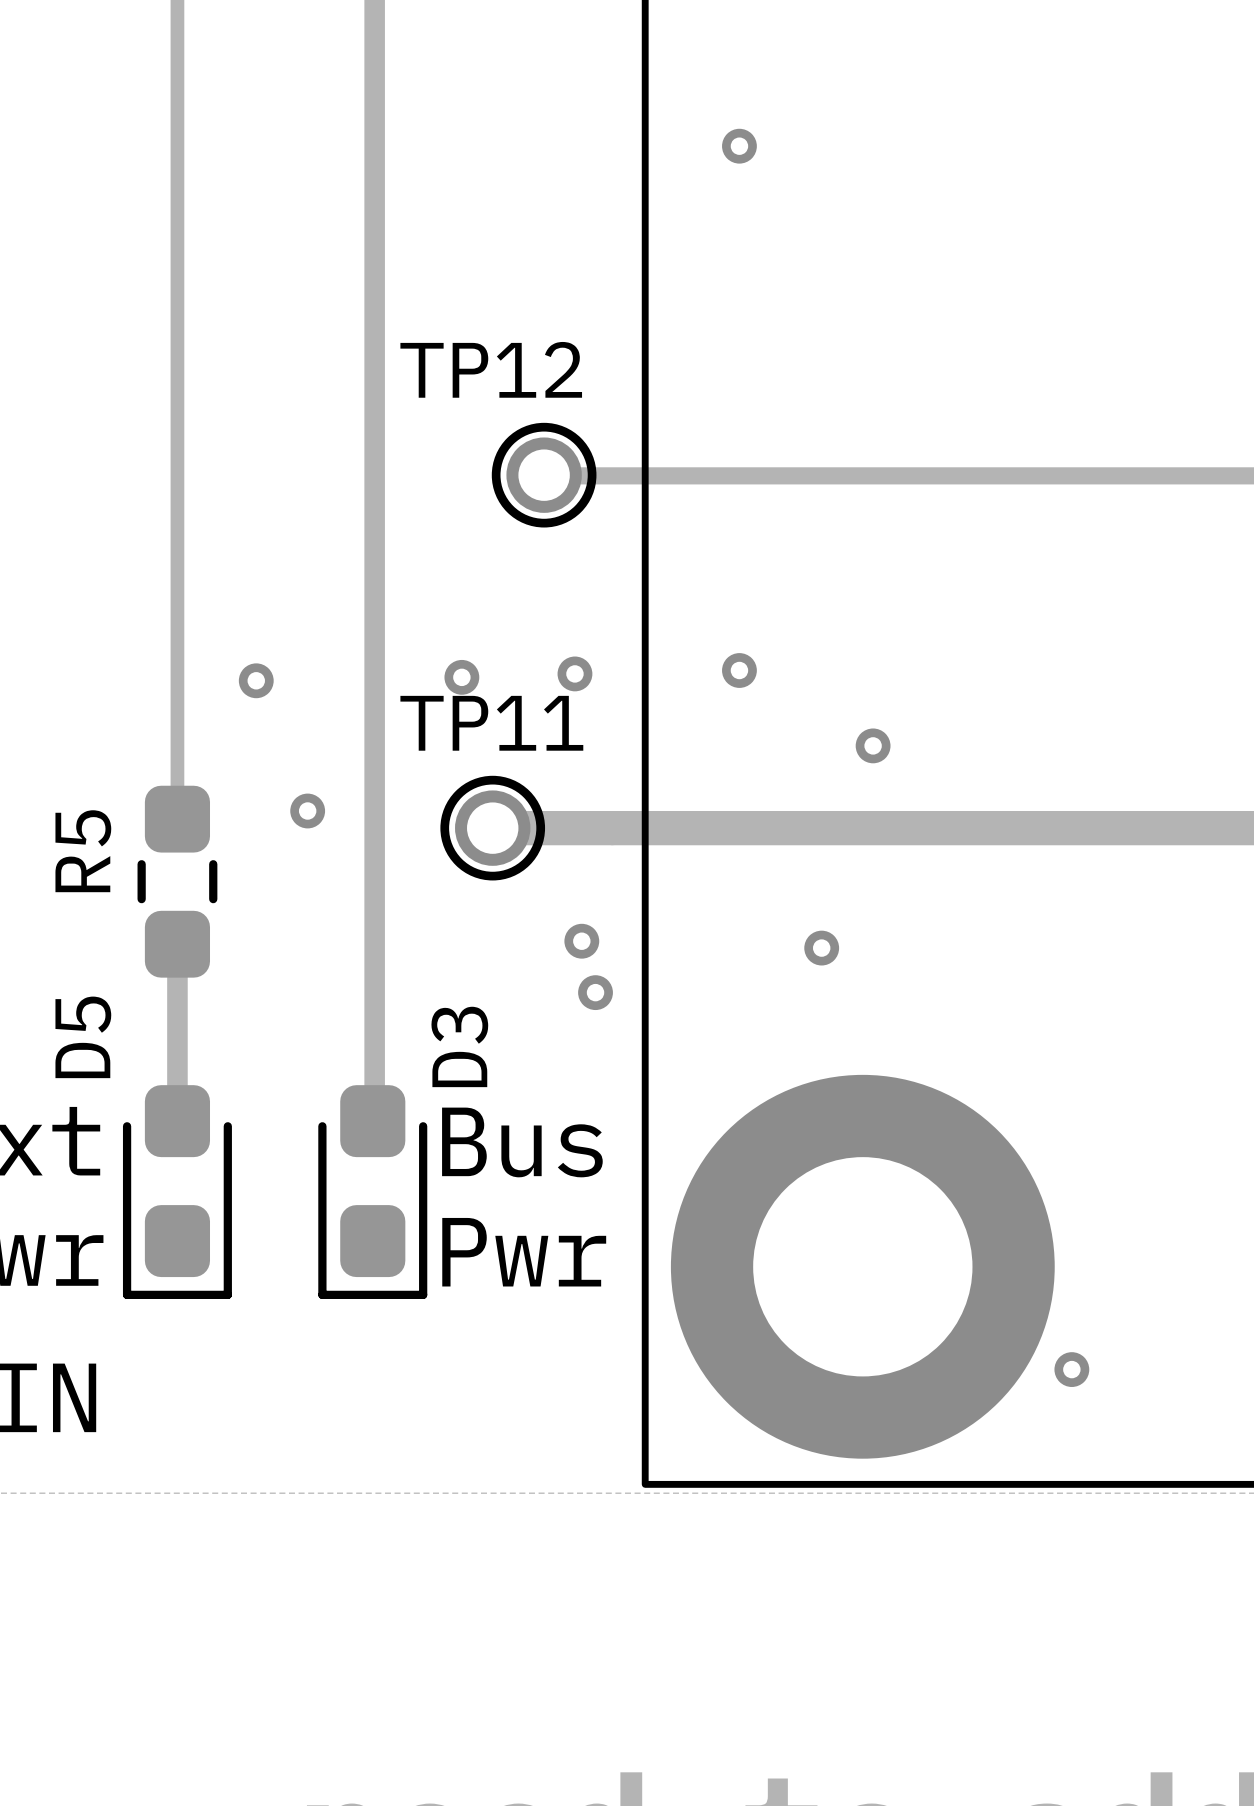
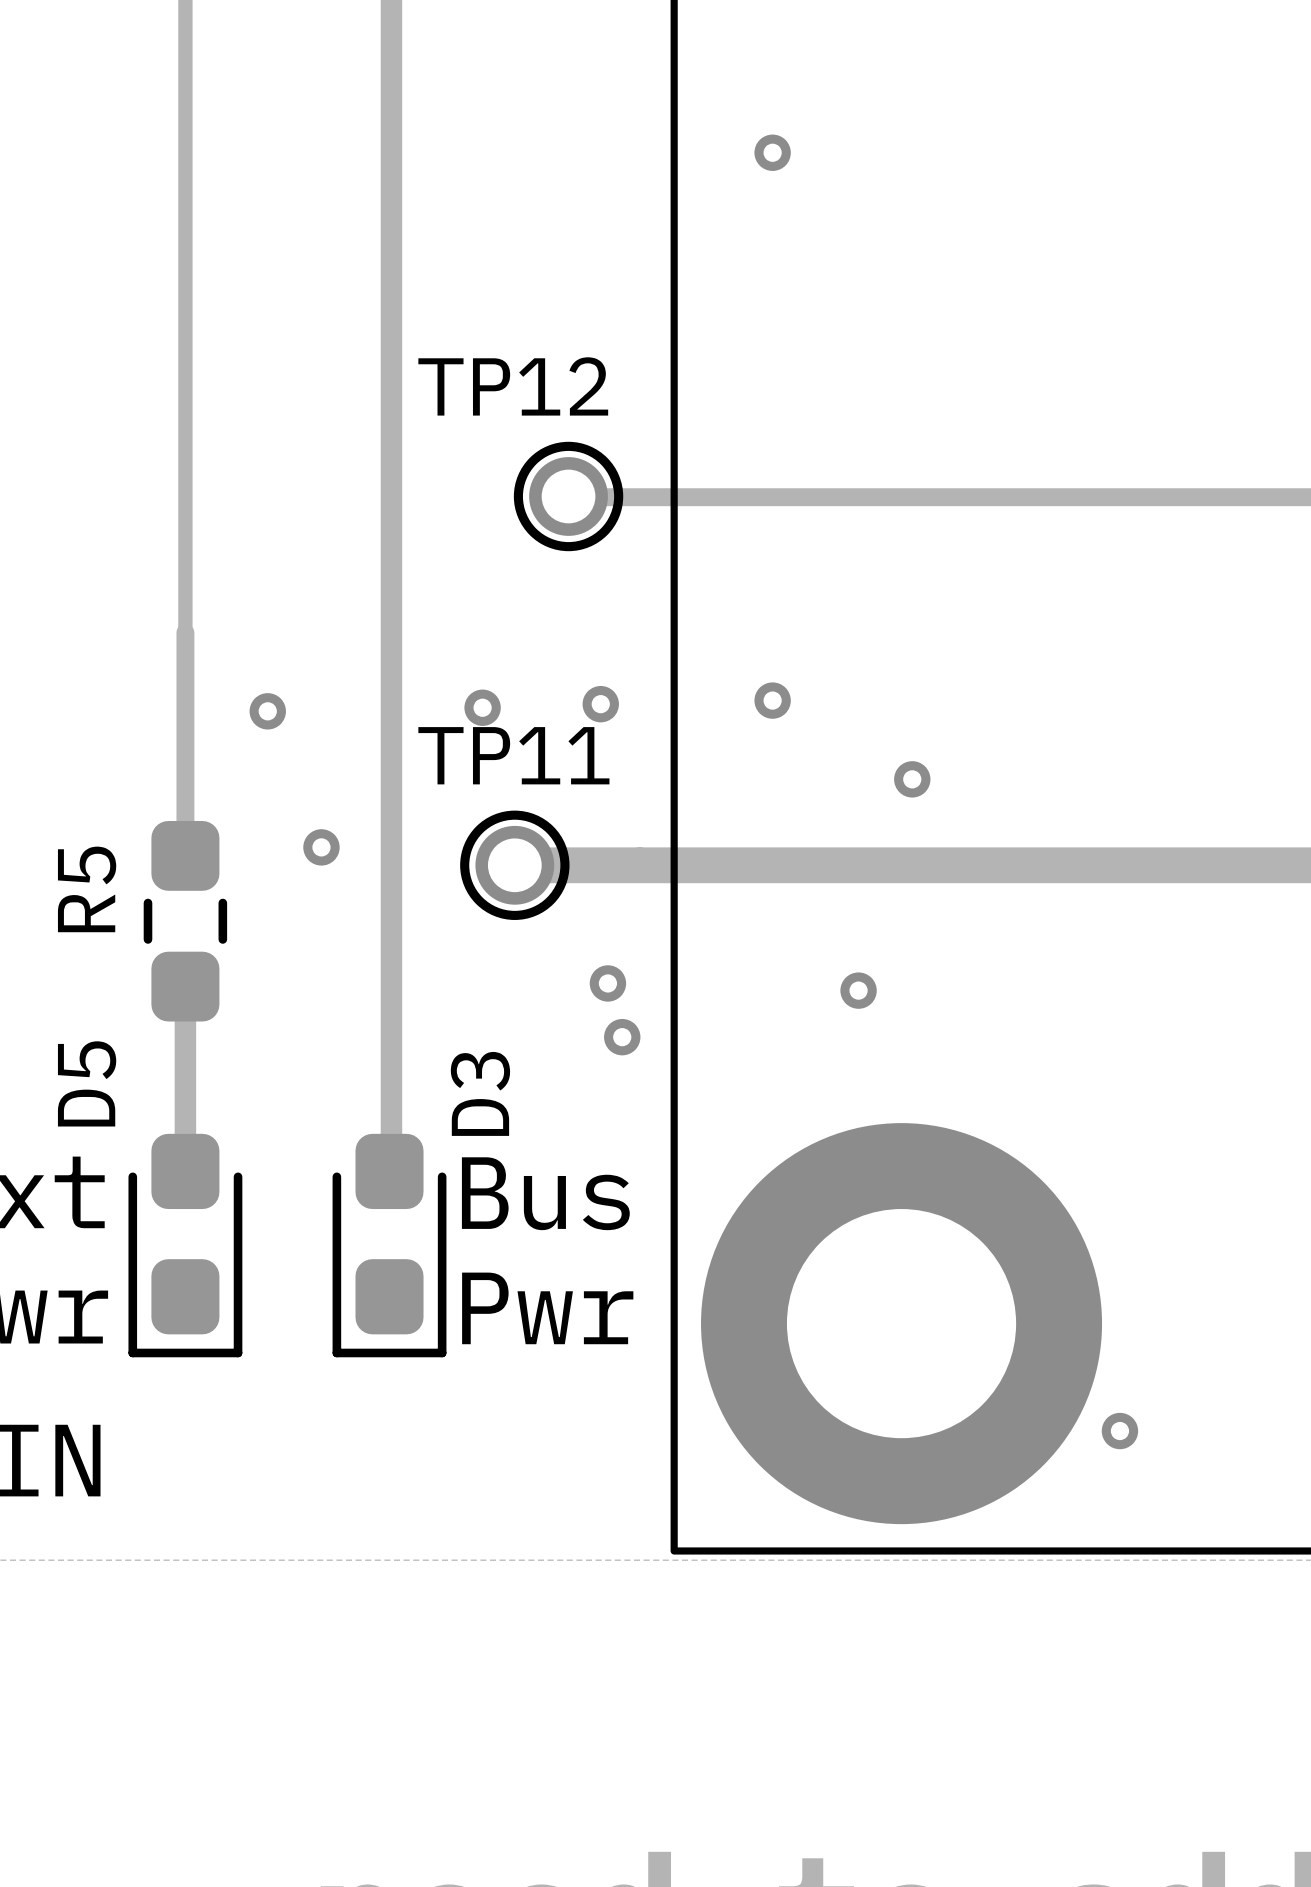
track width: thin (177, 605) (177, 819) -> thick (185, 632) (185, 855)

